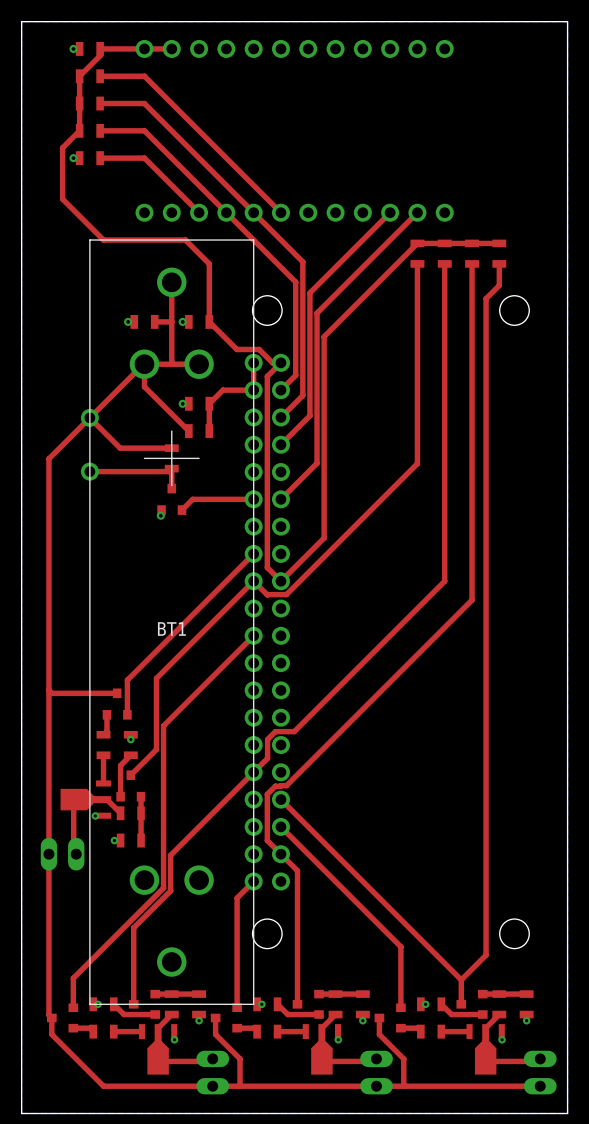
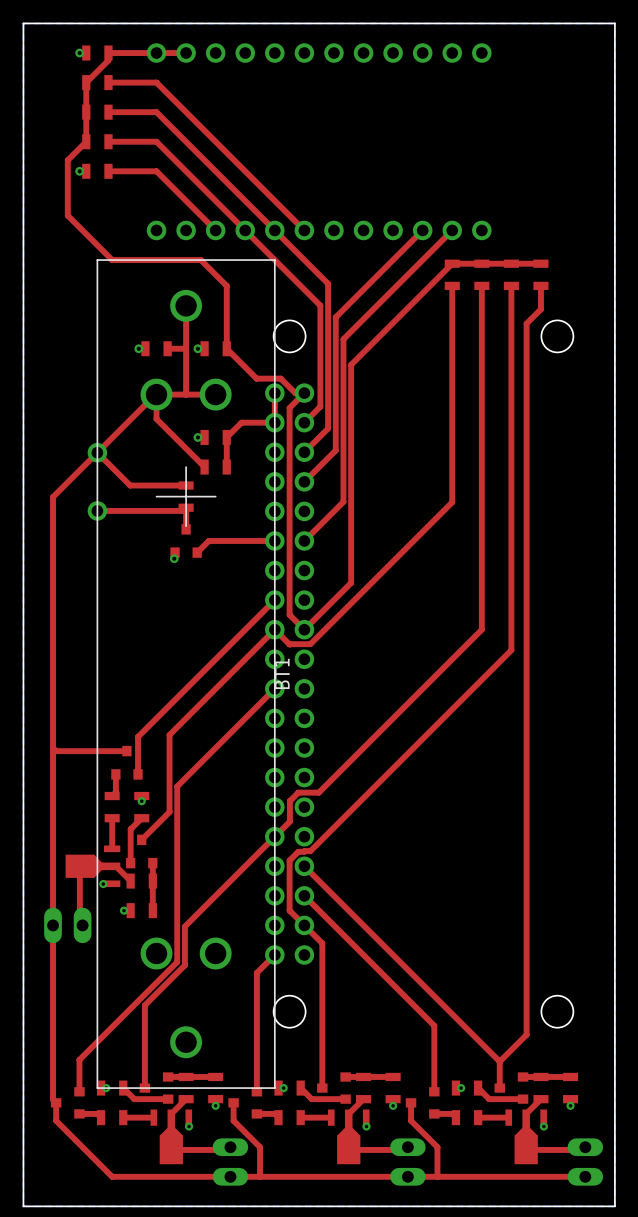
BT1 name rotation: 0° (171, 628) -> 90° counterclockwise (282, 673)
BT1 name position: BT1 (171, 628) -> BT1 (282, 673)

